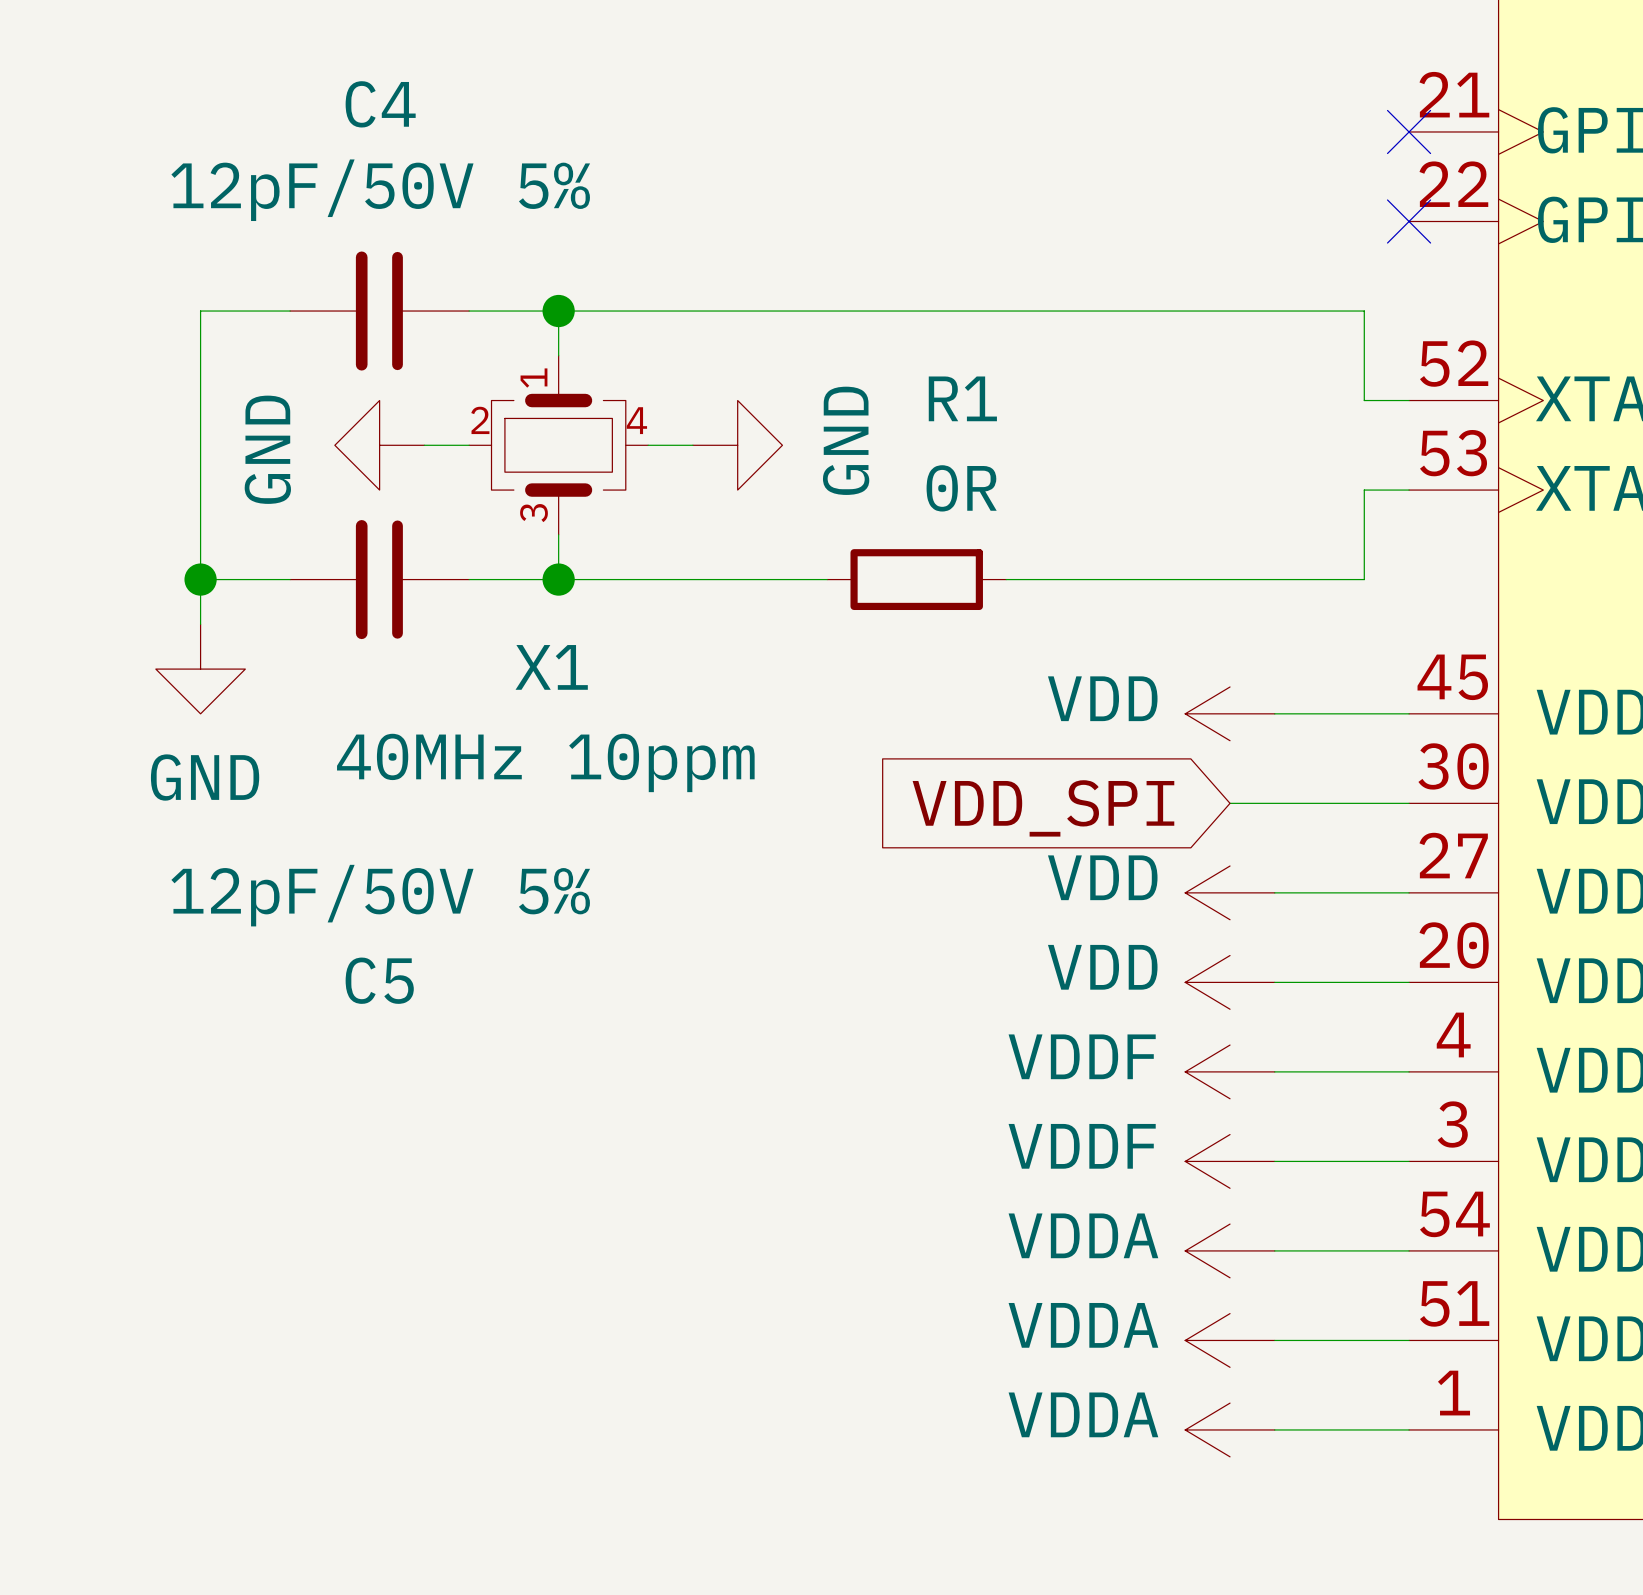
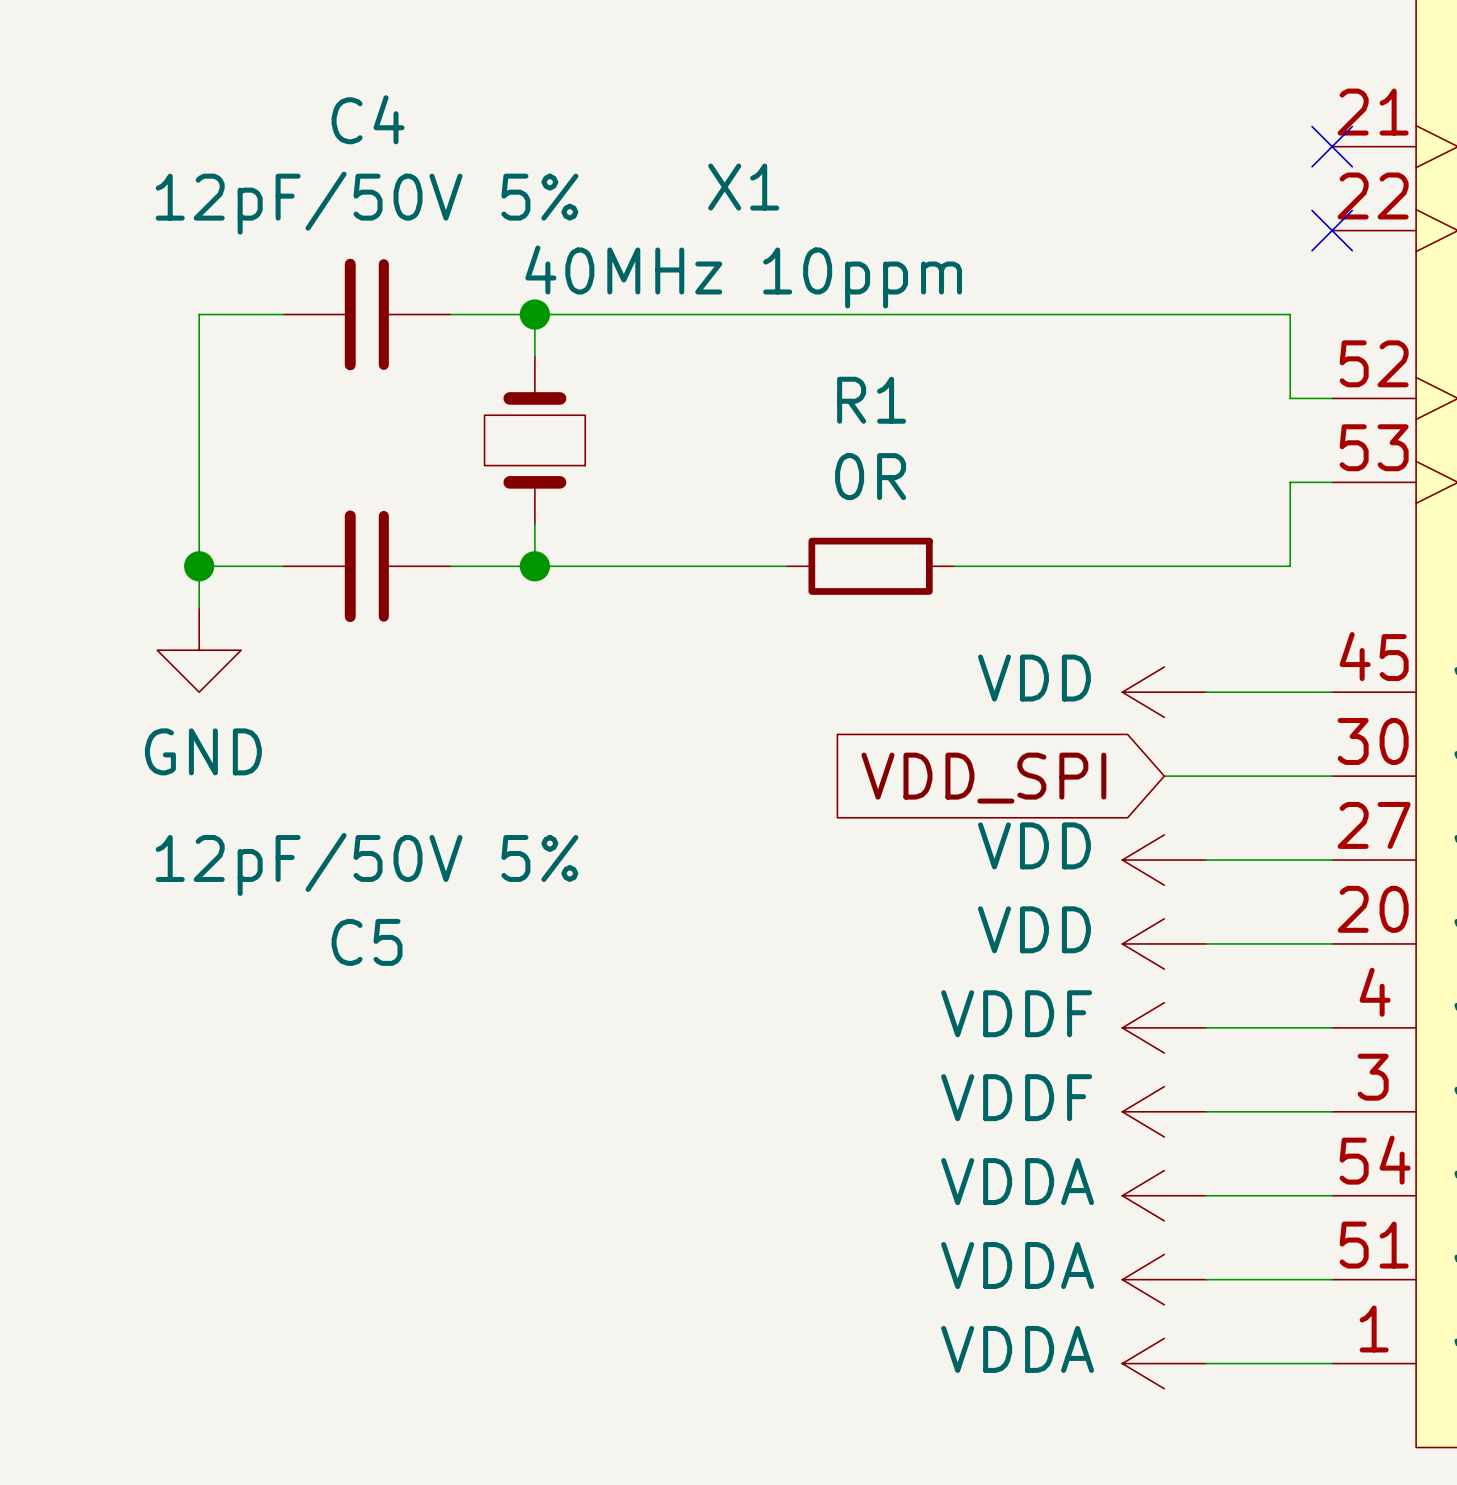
X1 symbol: [469, 355, 649, 535] -> [484, 356, 586, 525]
R1 name position: R1 (962, 398) -> R1 (871, 400)
power symbol: GND (379, 445) -> none
wire: (424, 445) (469, 445) -> none
wire: (648, 445) (692, 445) -> none
power symbol: GND (737, 445) -> none
R1 value position: 0R (961, 488) -> 0R (870, 476)
X1 name position: X1 (551, 667) -> X1 (743, 187)
X1 value position: 40MHz 10ppm (545, 762) -> 40MHz 10ppm (743, 276)

